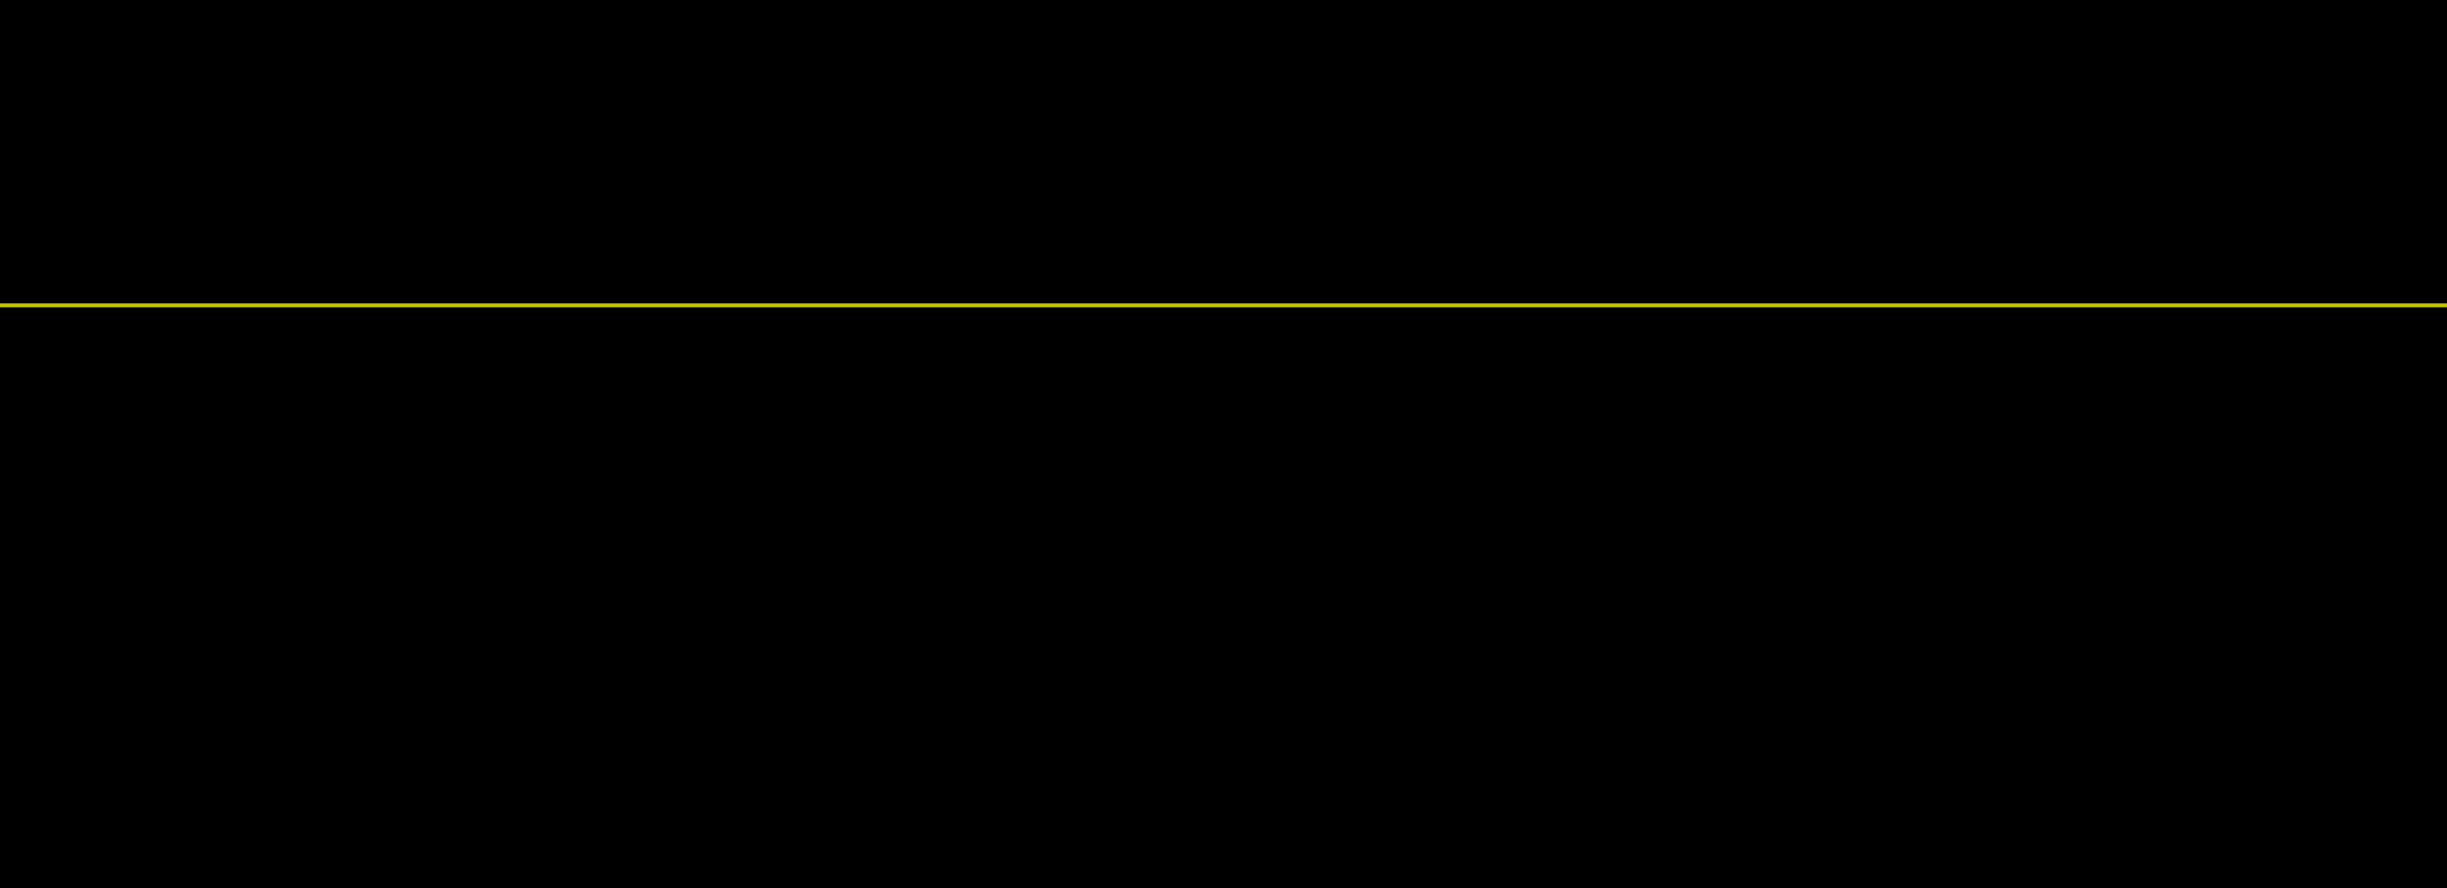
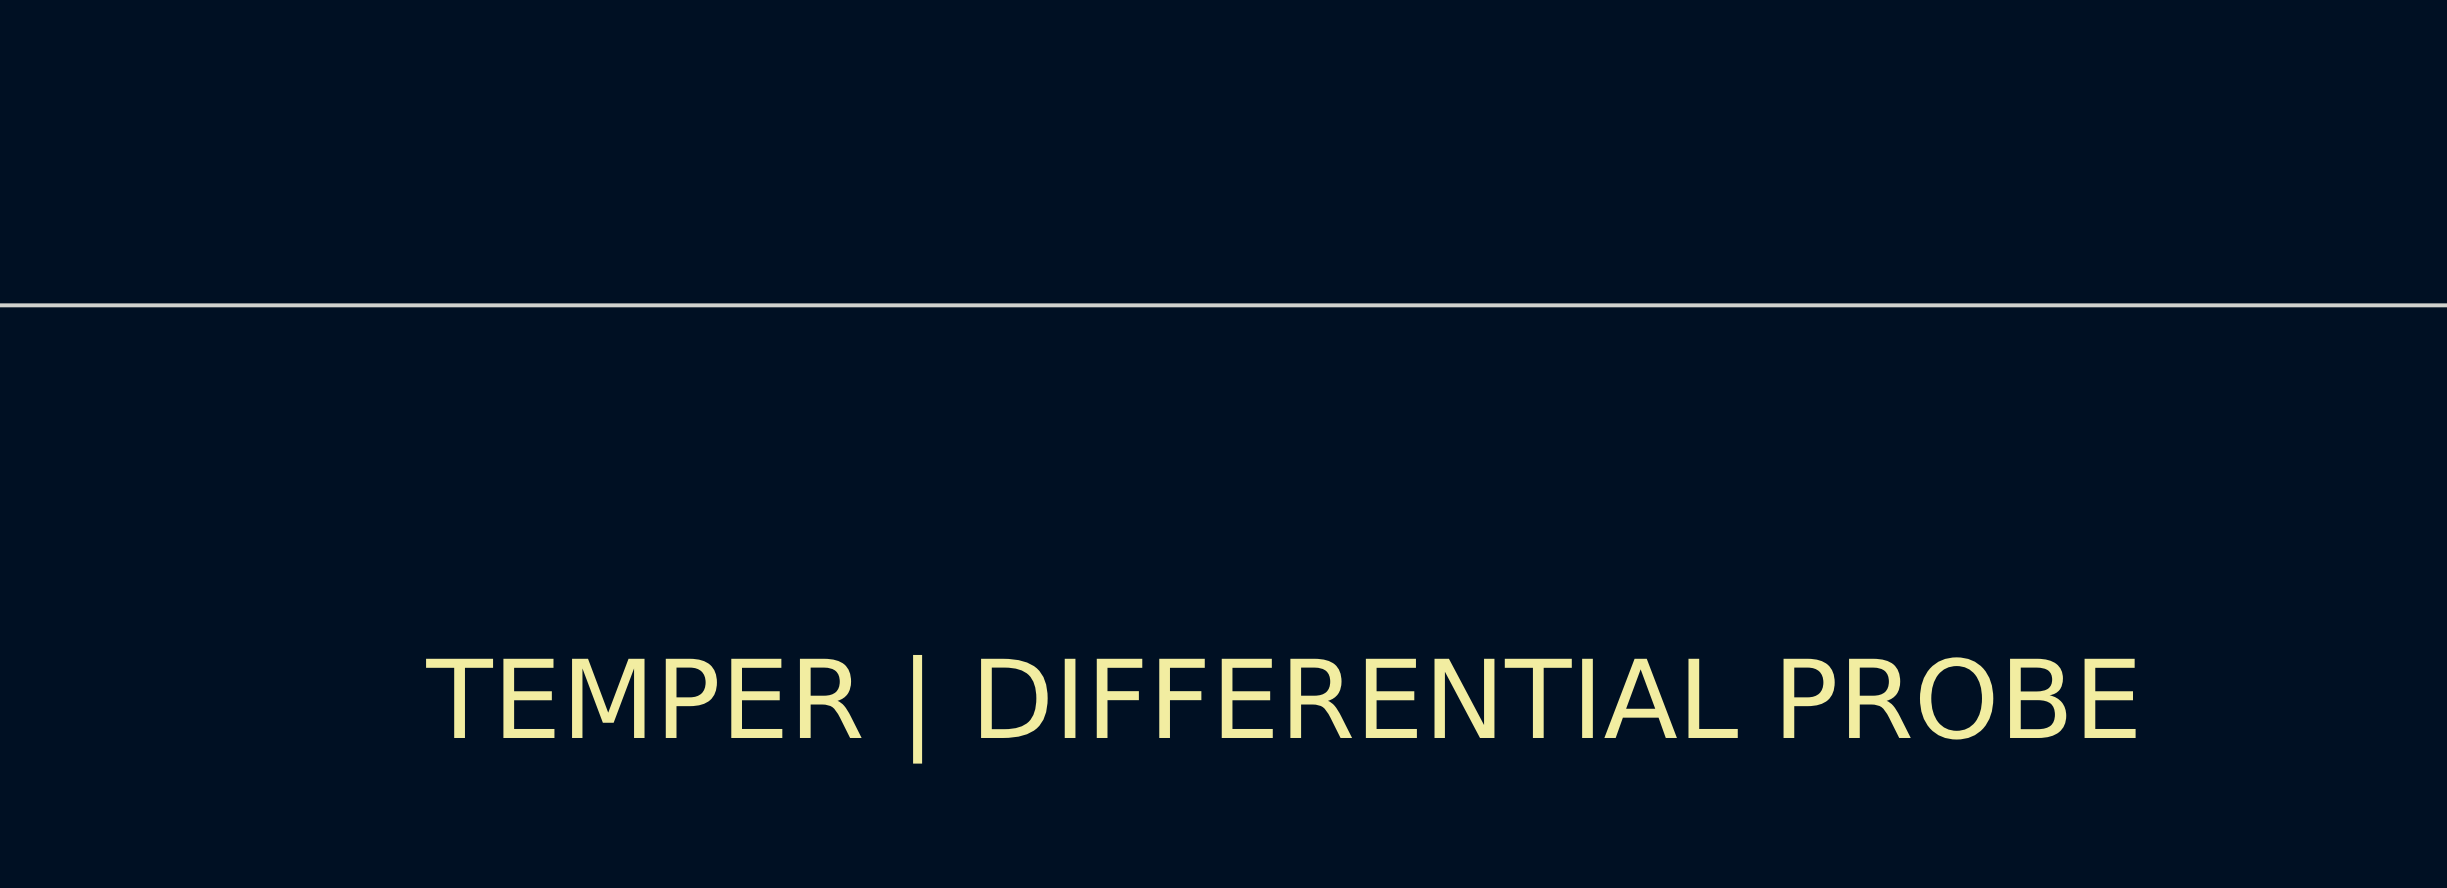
text: none -> TEMPER | DIFFERENTIAL PROBE (1280, 709)

